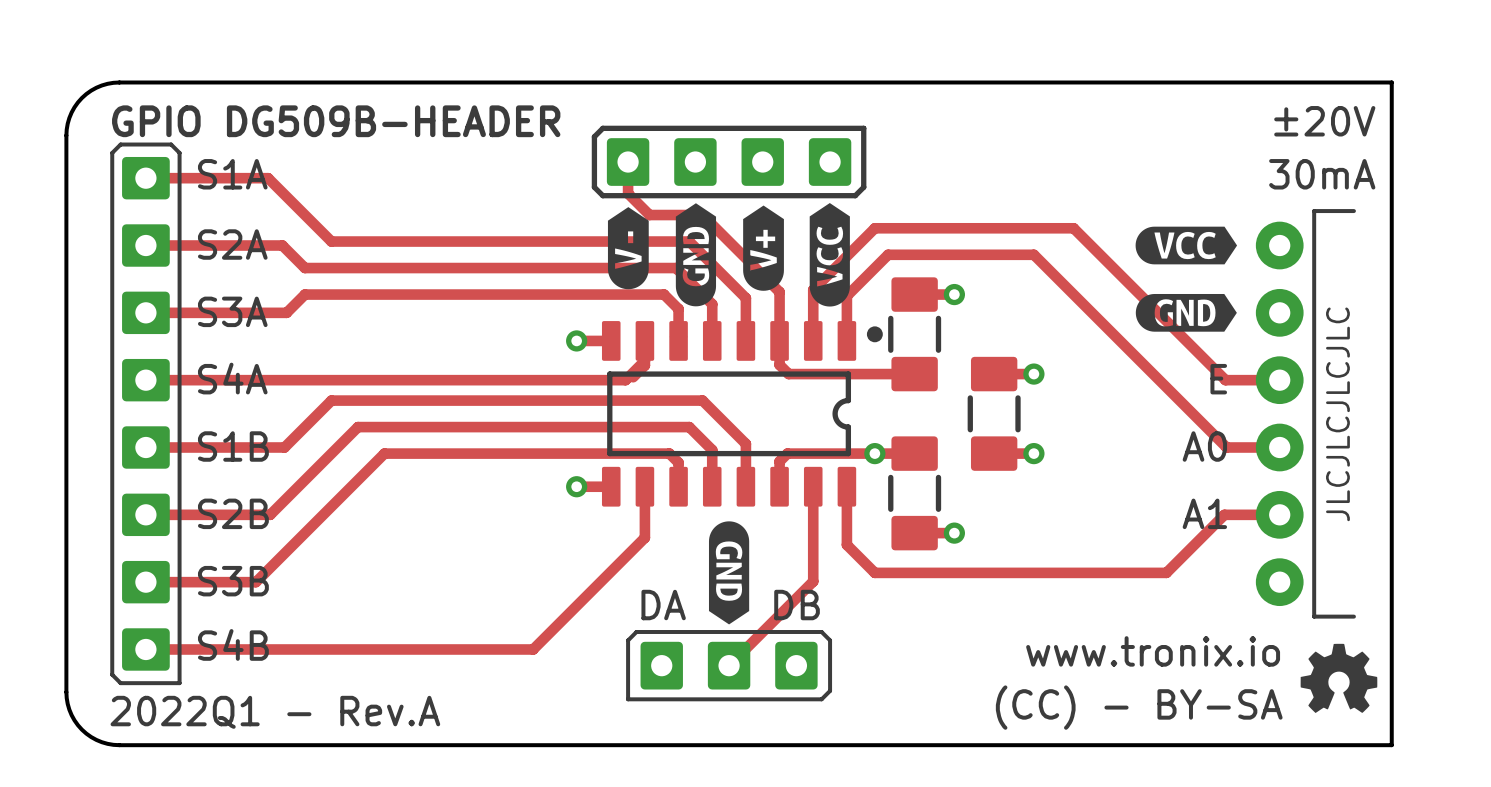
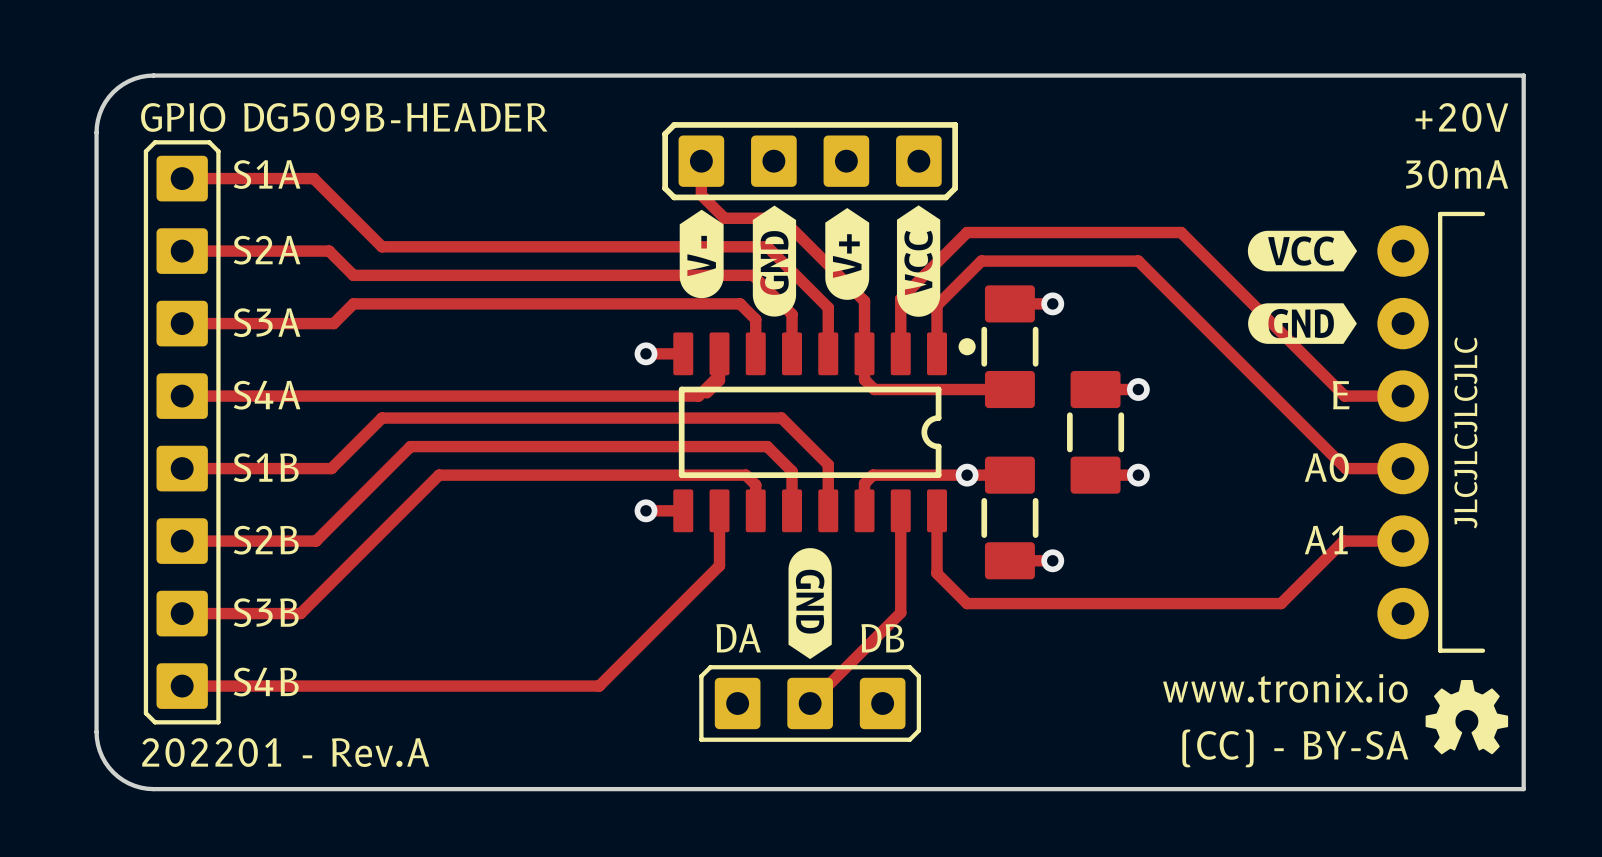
text: ±20V (1324, 121) -> +20V (1461, 117)
text: 2022Q1 - Rev.A (275, 712) -> 202201 - Rev.A (285, 752)

